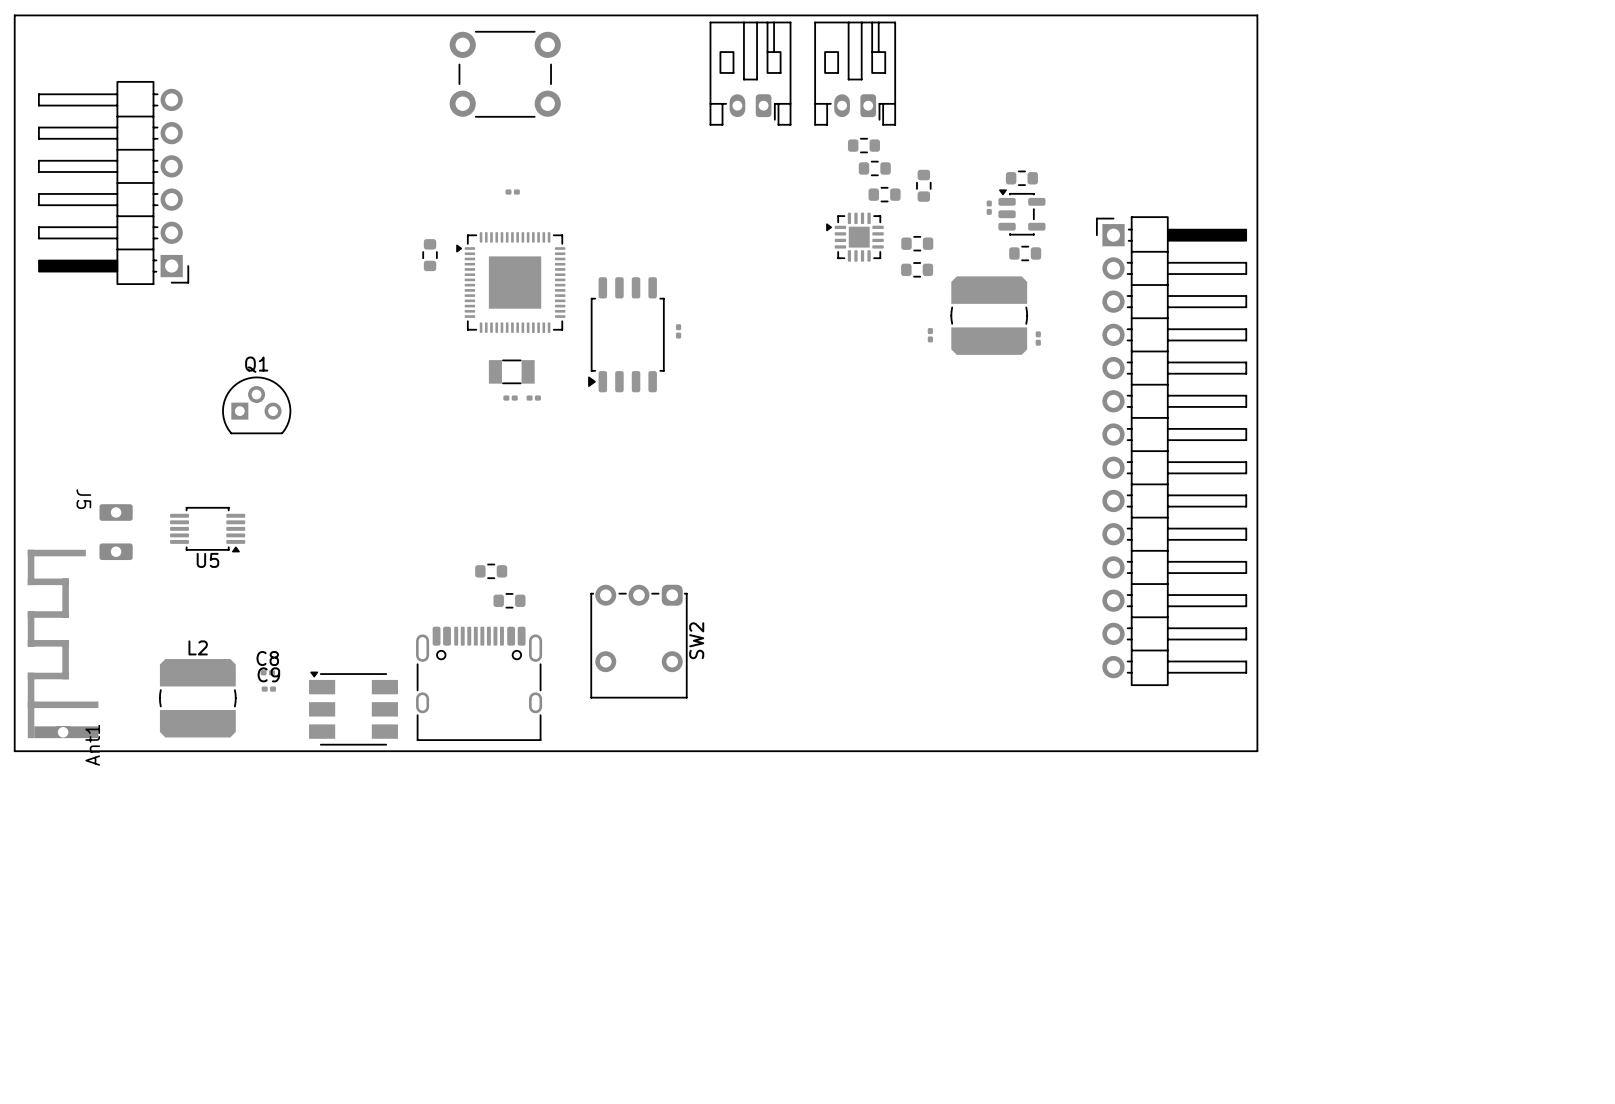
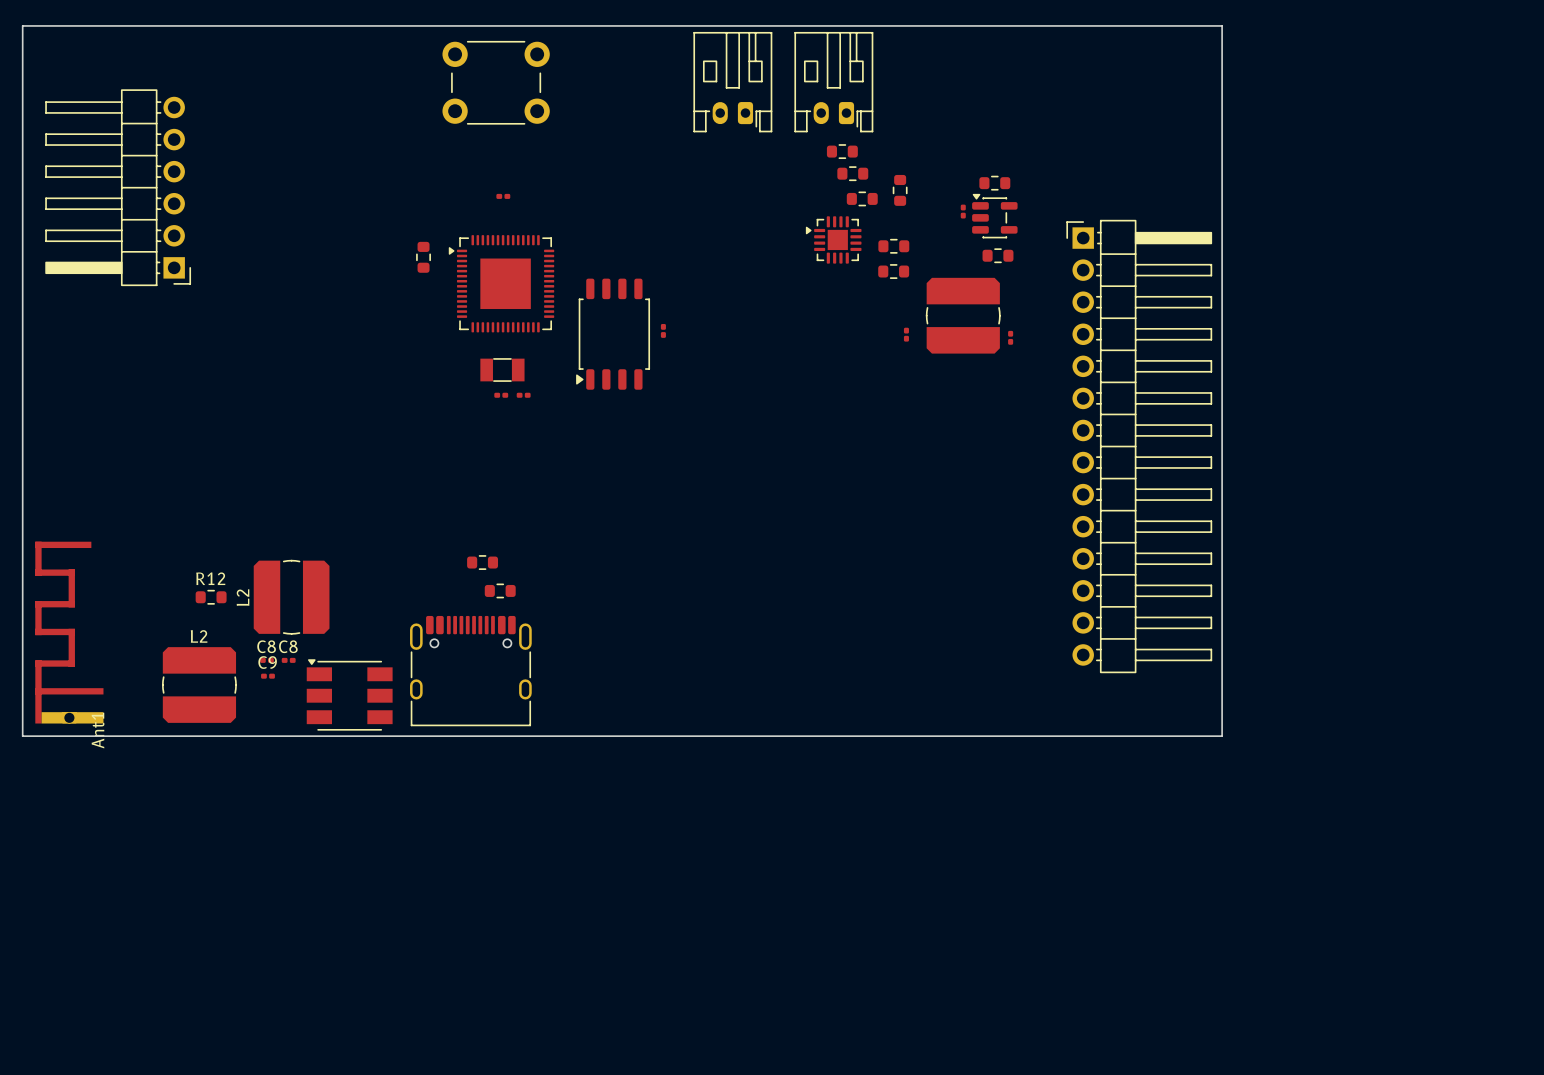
Q1: (256, 405) -> none
U5: (207, 529) -> none
J5: (116, 532) -> none
R12: none -> (211, 597)
L2: none -> (291, 597)
SW2: (638, 641) -> none
C8: none -> (288, 660)

